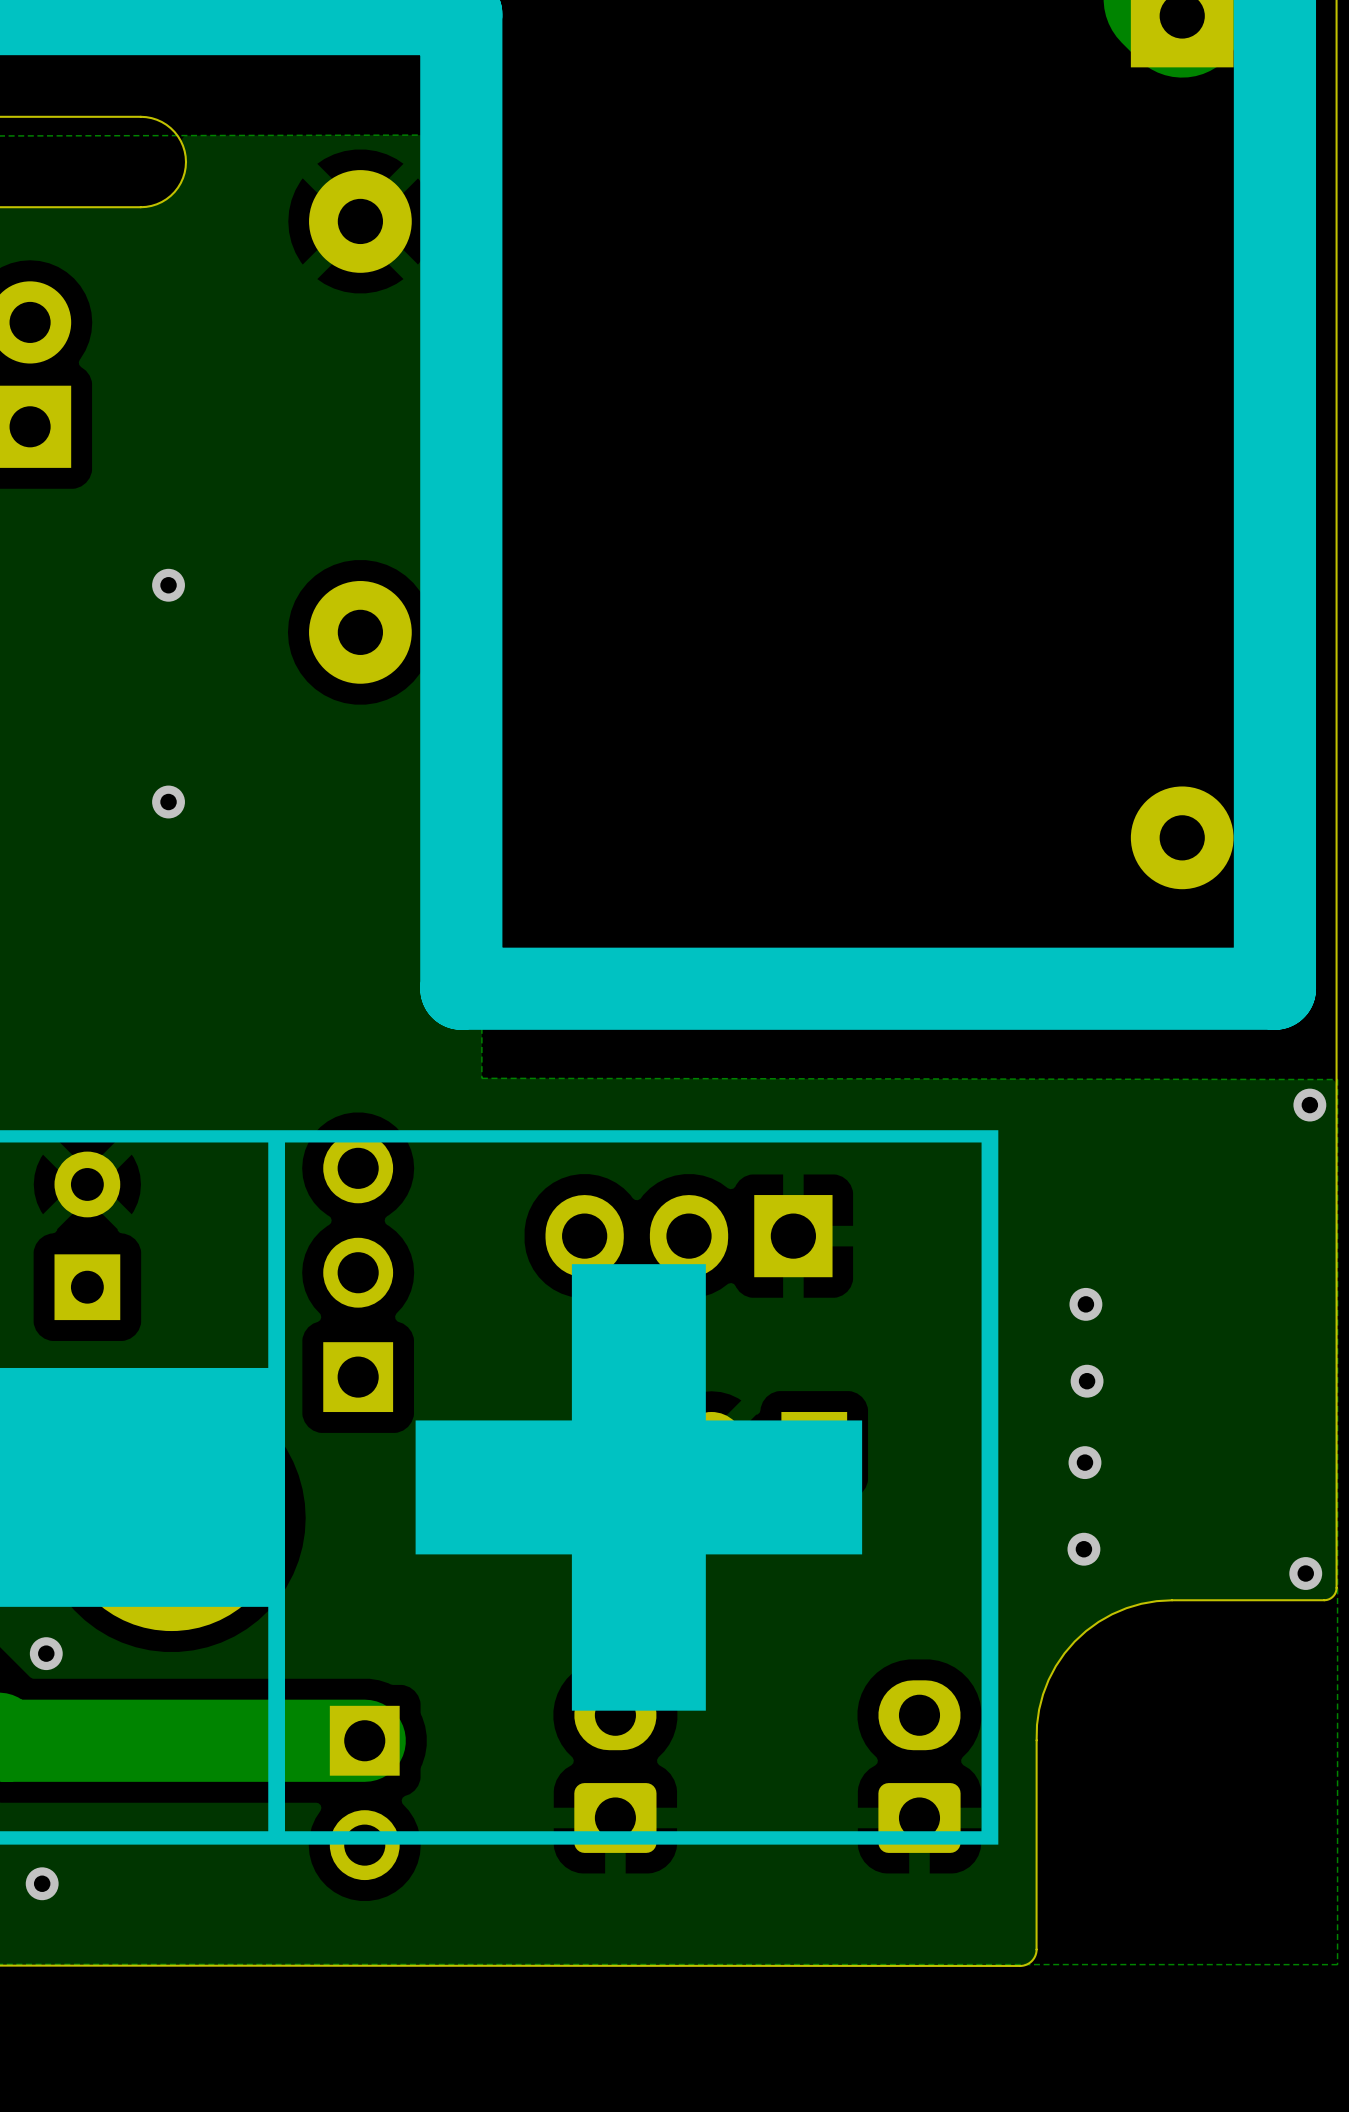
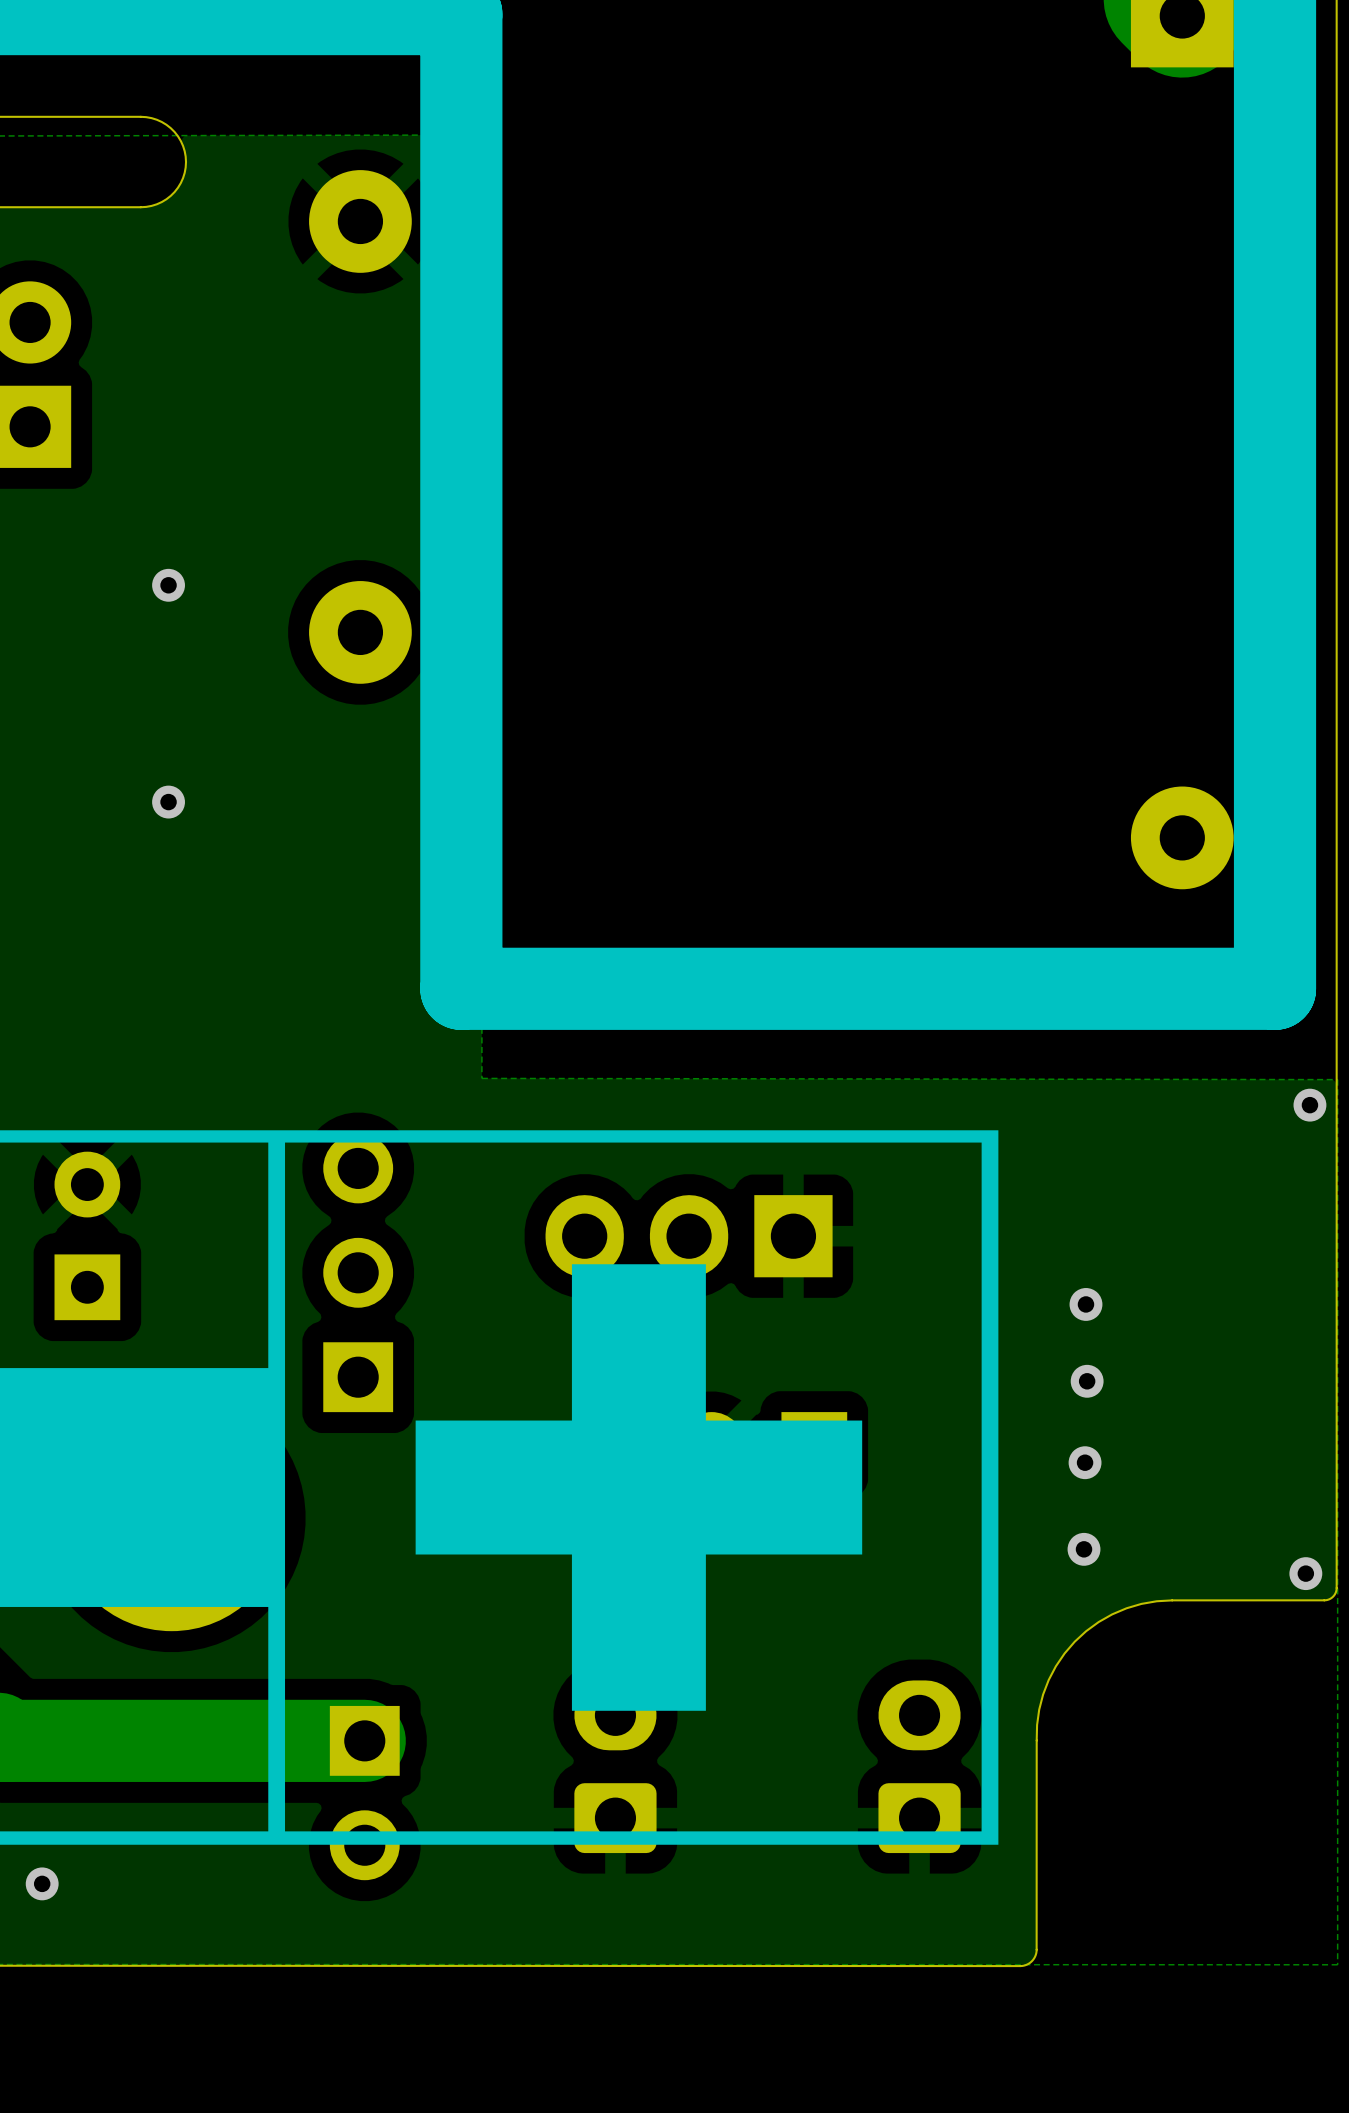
via: (46, 1653) -> none

